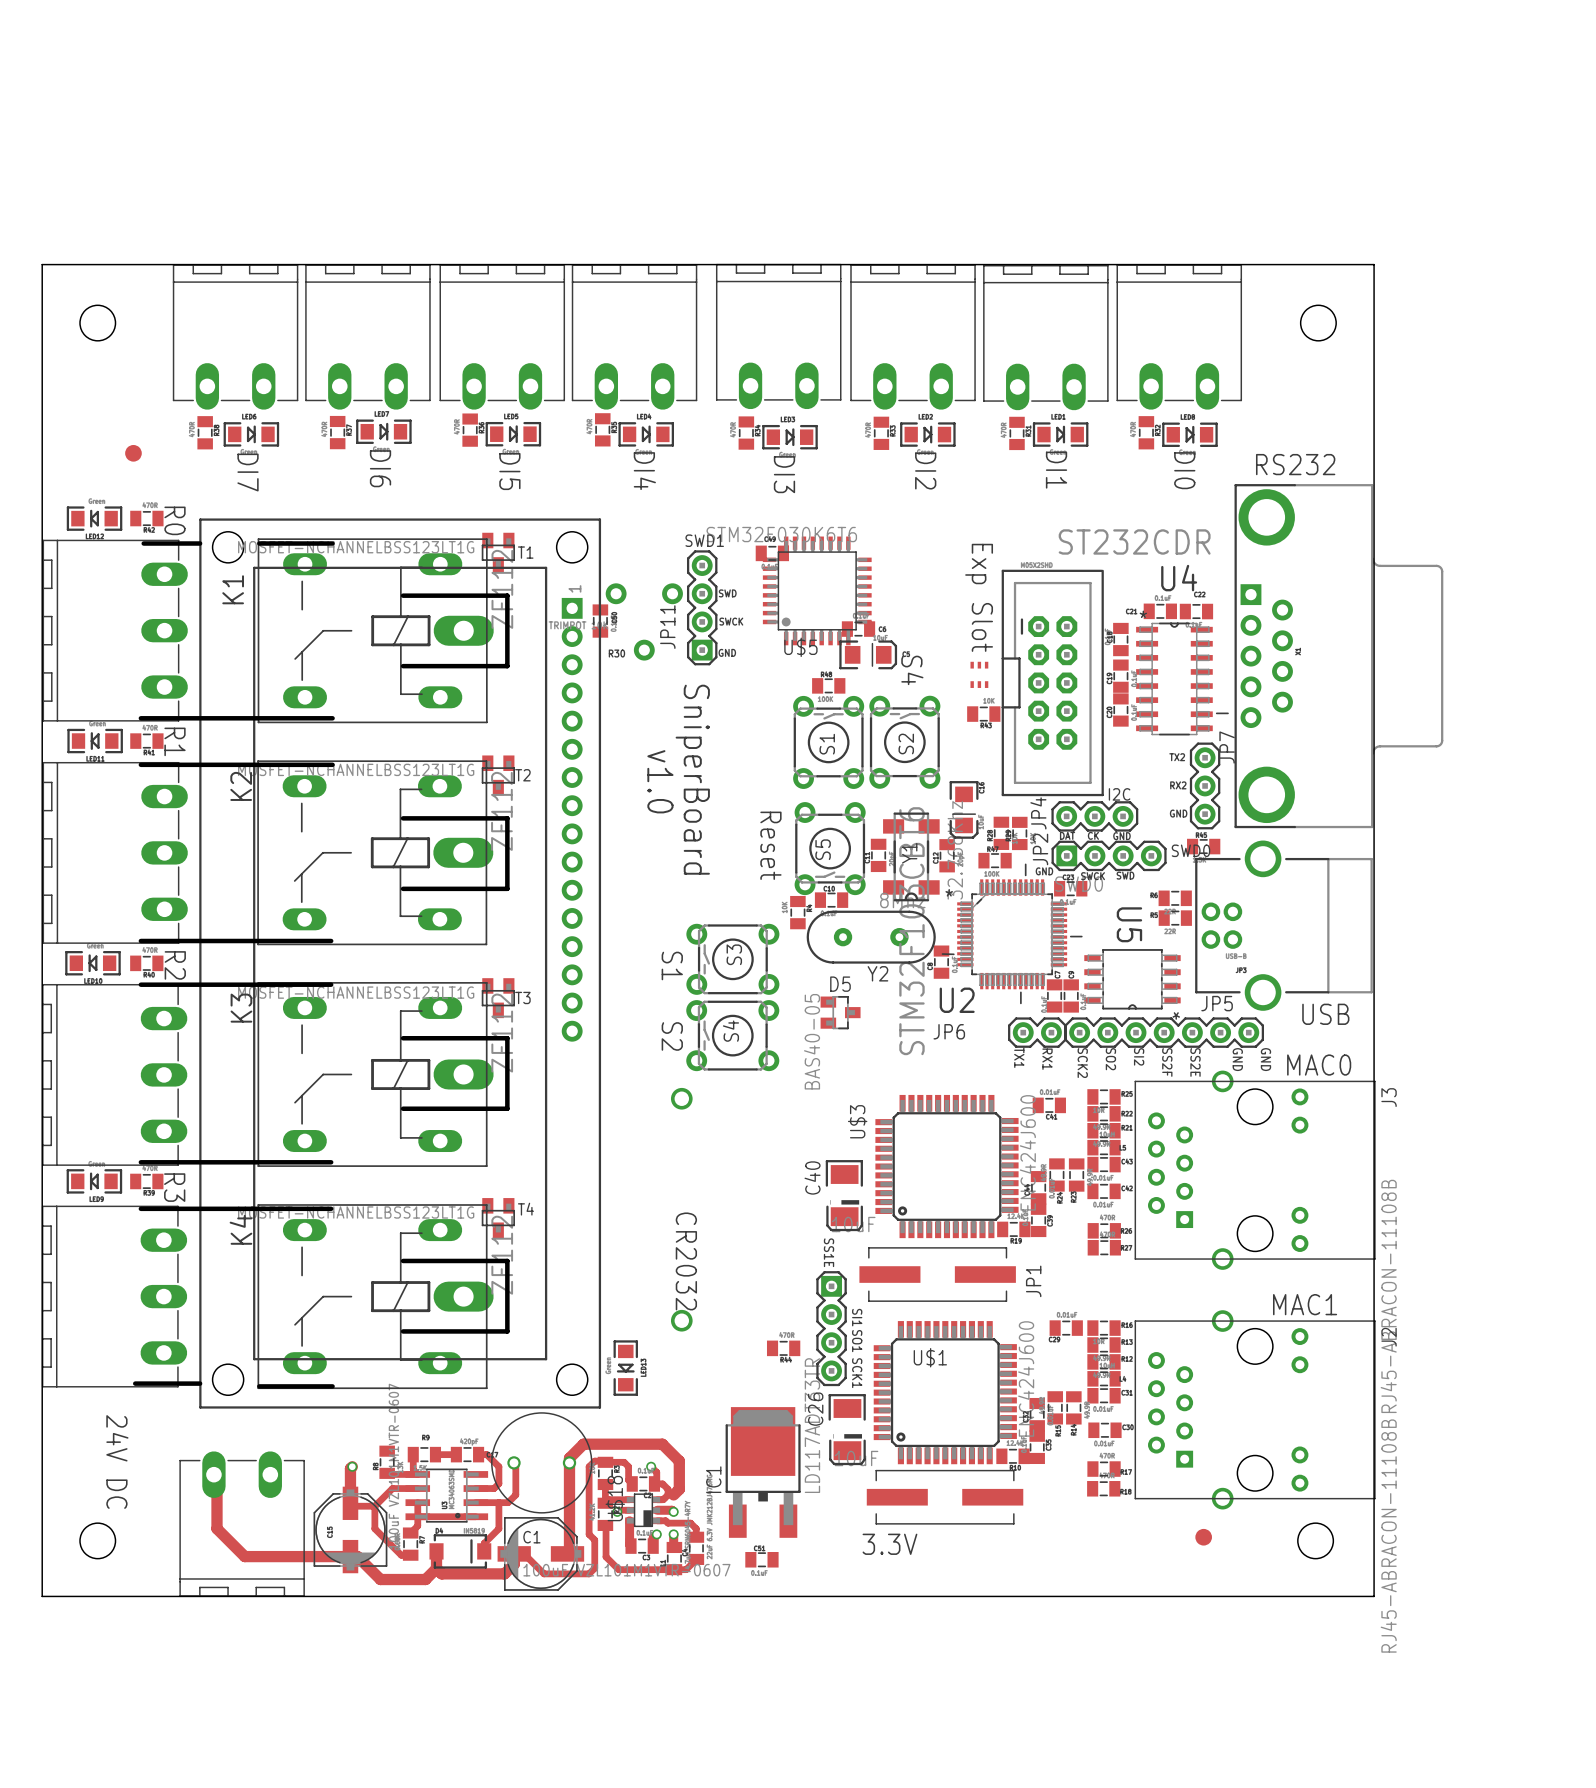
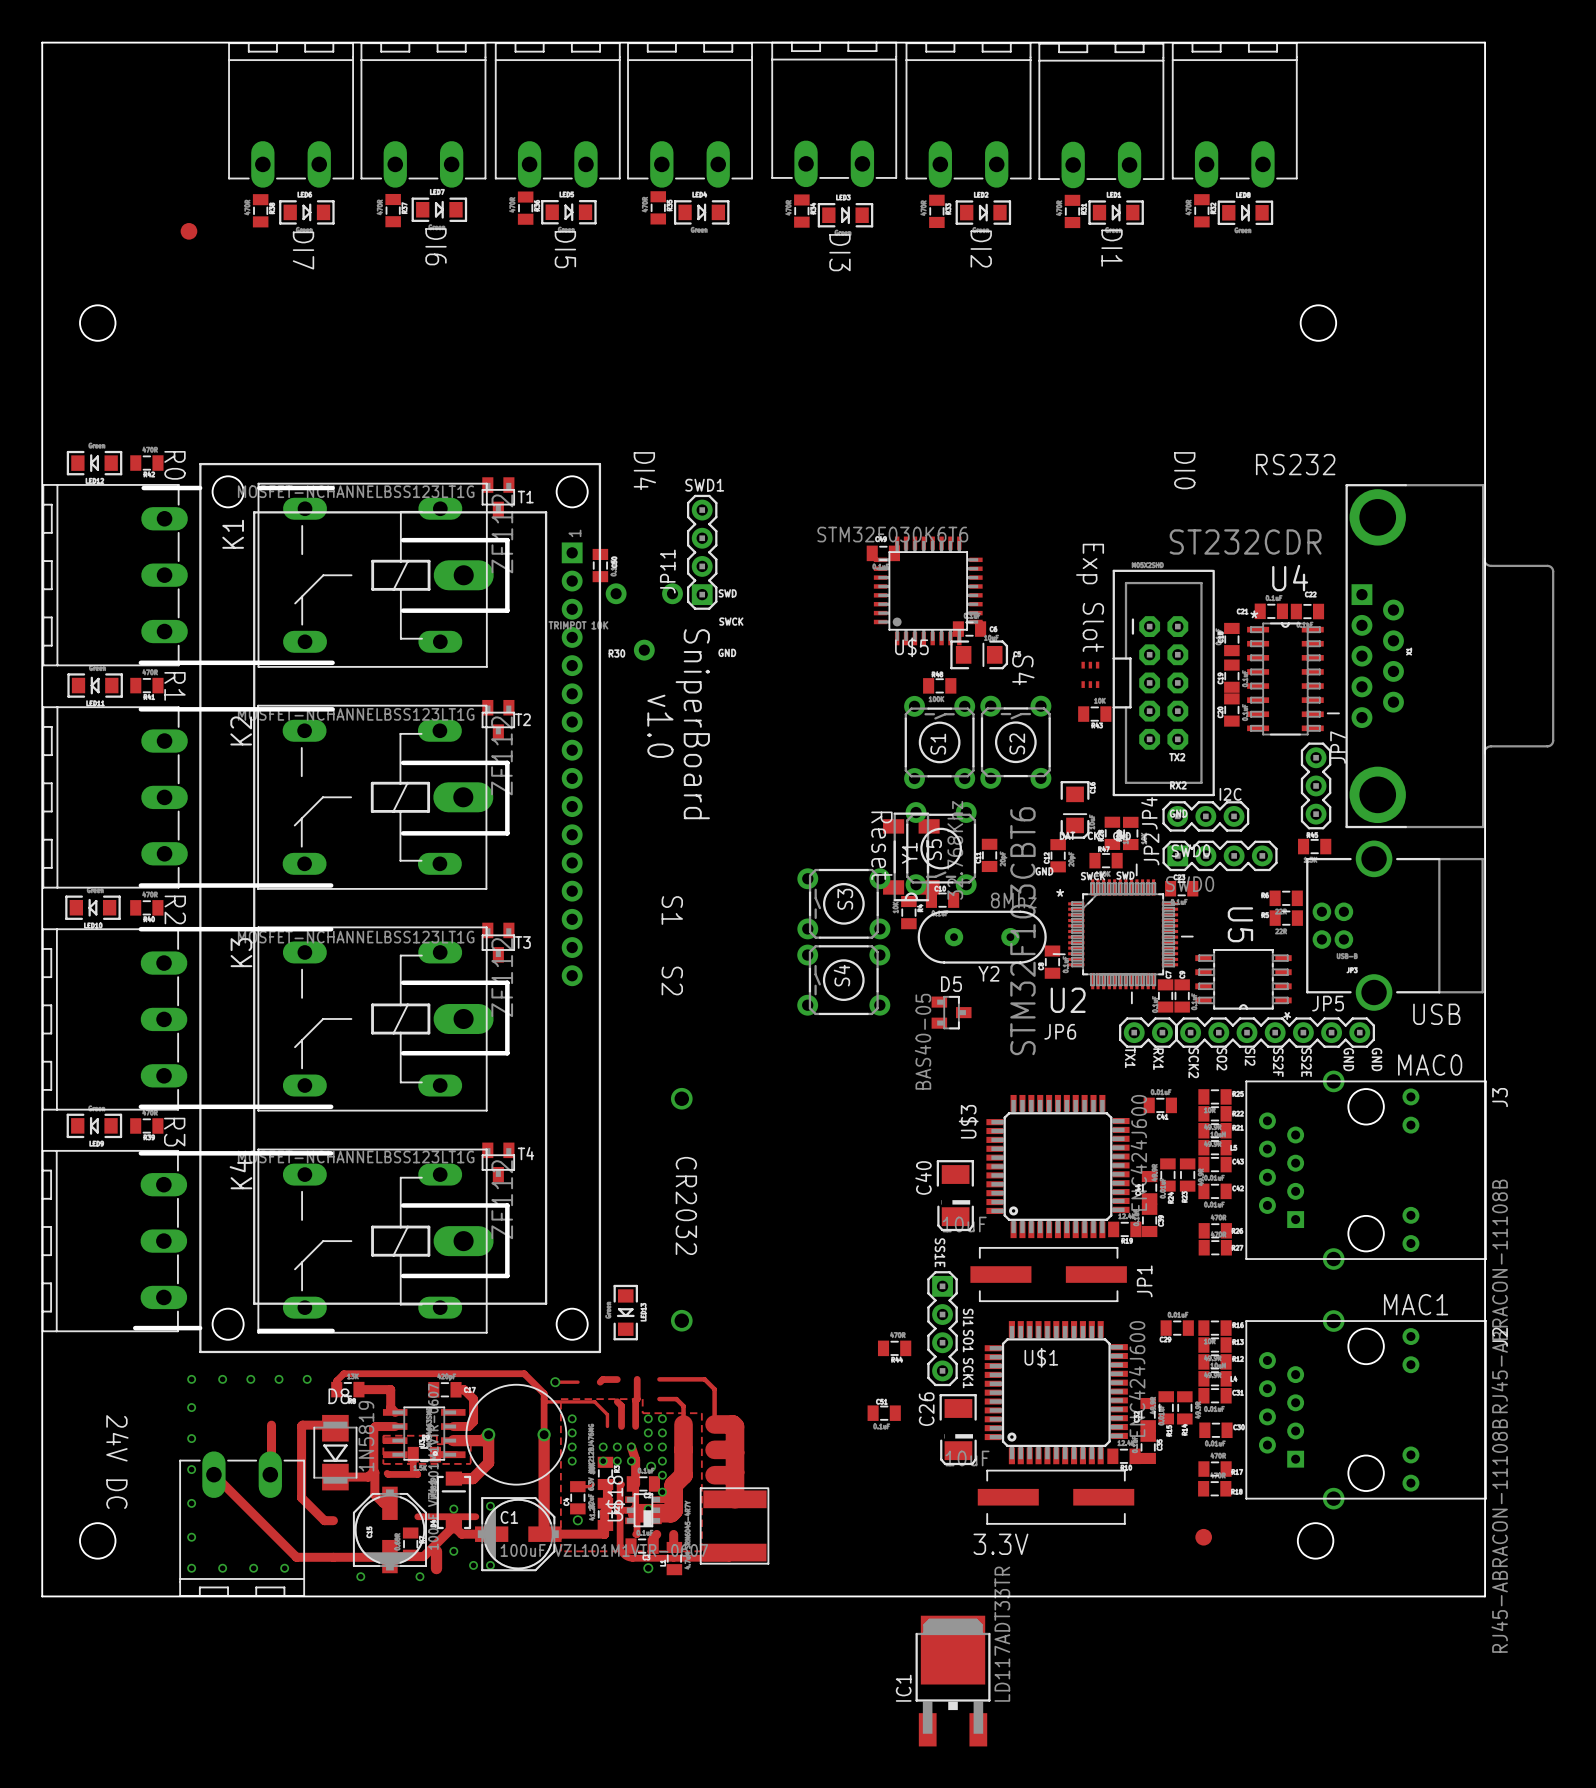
part: none -> (834, 114)
part: none -> (291, 115)
part: none -> (423, 115)
part: none -> (557, 115)
part: none -> (690, 115)
part: none -> (968, 115)
part: none -> (1101, 115)
part: none -> (1234, 115)
board edge: (42, 264) (1374, 264) (1374, 1596) -> (42, 264) (42, 42) (1485, 42) (1485, 1596) (1374, 1596)
part: (778, 336) -> none
part: (235, 337) -> none
part: (367, 337) -> none
part: (502, 337) -> none
part: (634, 337) -> none
part: (913, 337) -> none
part: (1045, 337) -> none
part: (1179, 337) -> none
part position: (602, 429) -> (658, 207)
part position: (470, 430) -> (525, 208)
part position: (383, 431) -> (439, 209)
part position: (205, 432) -> (260, 210)
part position: (337, 432) -> (393, 210)
part position: (1146, 432) -> (1201, 210)
part position: (746, 433) -> (801, 211)
part position: (881, 433) -> (936, 211)
part position: (1016, 433) -> (1072, 211)
part position: (251, 434) -> (306, 212)
part position: (513, 434) -> (568, 212)
part position: (646, 434) -> (701, 212)
part position: (927, 434) -> (983, 212)
part position: (1060, 434) -> (1116, 212)
part position: (1189, 434) -> (1245, 212)
part position: (790, 437) -> (845, 215)
part position: (133, 453) -> (188, 231)
text position: DI6 (380, 468) -> DI6 (436, 246)
text position: DI2 (925, 470) -> DI2 (981, 249)
text position: DI1 (1056, 470) -> DI1 (1112, 248)
text position: DI5 (509, 471) -> DI5 (565, 249)
text position: DI7 (248, 472) -> DI7 (303, 250)
text position: DI3 (784, 474) -> DI3 (839, 252)
part position: (94, 518) -> (94, 463)
part position: (146, 518) -> (146, 463)
text position: R0 (174, 520) -> R0 (174, 465)
text position: SWD1 (704, 540) -> SWD1 (704, 485)
board edge: (143, 543) (200, 543) -> (143, 488) (200, 488)
board edge: (259, 543) (332, 543) -> (259, 488) (332, 488)
T1 position: (498, 552) -> (498, 497)
part position: (772, 553) -> (883, 553)
U$5 position: (817, 590) -> (928, 590)
board edge: (403, 595) (507, 595) -> (403, 540) (507, 540) (507, 595)
text position: Exp Slot (979, 597) -> Exp Slot (1090, 597)
JP11 position: (702, 607) -> (702, 552)
board edge: (507, 610) (507, 666) (403, 666) -> (507, 610) (403, 610)
part position: (1160, 611) -> (1271, 611)
part position: (1196, 611) -> (1307, 611)
part position: (600, 621) -> (600, 565)
part position: (858, 629) -> (969, 629)
part position: (115, 630) -> (115, 575)
K1 position: (375, 630) -> (375, 575)
part position: (1120, 639) -> (1231, 639)
part position: (868, 654) -> (979, 654)
part position: (1338, 656) -> (1449, 656)
text position: S4 (912, 670) -> S4 (1023, 670)
part position: (979, 674) -> (1090, 674)
part position: (1120, 676) -> (1231, 676)
U4 position: (1182, 678) -> (1293, 678)
part position: (1052, 682) -> (1163, 682)
part position: (828, 685) -> (939, 685)
part position: (1120, 710) -> (1231, 710)
part position: (983, 714) -> (1094, 714)
board edge: (140, 718) (332, 718) -> (140, 662) (332, 662)
part position: (95, 741) -> (95, 685)
part position: (146, 741) -> (146, 685)
text position: R1 (174, 741) -> R1 (174, 686)
S1 position: (828, 742) -> (939, 742)
S2 position: (904, 742) -> (1015, 742)
board edge: (140, 764) (332, 764) -> (140, 709) (332, 709)
T2 position: (498, 775) -> (498, 719)
text position: SniperBoard (692, 779) -> SniperBoard (692, 724)
text position: v1.0 (660, 781) -> v1.0 (660, 726)
JP7 position: (1205, 785) -> (1316, 785)
text position: I2C (1119, 794) -> I2C (1230, 794)
part position: (964, 809) -> (1075, 809)
JP4 position: (1094, 816) -> (1205, 816)
board edge: (403, 818) (507, 818) -> (403, 762) (507, 762) (507, 818)
board edge: (507, 833) (507, 888) (403, 888) -> (507, 833) (403, 833)
part position: (1001, 833) -> (1112, 833)
part position: (1019, 833) -> (1130, 833)
text position: Reset (770, 845) -> Reset (881, 845)
part position: (1203, 846) -> (1314, 846)
S5 position: (830, 848) -> (941, 848)
part position: (115, 852) -> (115, 797)
K2 position: (375, 852) -> (375, 797)
part position: (878, 855) -> (989, 855)
part position: (947, 855) -> (1058, 855)
JP2 position: (1109, 855) -> (1220, 855)
part position: (995, 860) -> (1106, 860)
part position: (1070, 888) -> (1181, 888)
part position: (1175, 898) -> (1286, 898)
part position: (831, 900) -> (942, 900)
part position: (797, 912) -> (908, 912)
part position: (1175, 918) -> (1286, 918)
part position: (1283, 925) -> (1394, 925)
U2 position: (1012, 933) -> (1123, 933)
Y2 position: (871, 937) -> (982, 937)
board edge: (140, 941) (331, 941) -> (140, 885) (331, 885)
S3 position: (732, 959) -> (843, 903)
part position: (941, 962) -> (1052, 962)
part position: (92, 963) -> (92, 907)
part position: (146, 963) -> (146, 907)
part position: (400, 963) -> (400, 908)
text position: R2 (175, 965) -> R2 (175, 909)
text position: S1 (672, 966) -> S1 (672, 910)
U5 position: (1132, 979) -> (1243, 979)
board edge: (140, 984) (331, 984) -> (140, 929) (331, 929)
part position: (1054, 995) -> (1165, 995)
part position: (1071, 995) -> (1182, 995)
T3 position: (498, 998) -> (498, 942)
D5 position: (840, 1012) -> (951, 1012)
text position: USB (1325, 1014) -> USB (1436, 1014)
JP6 position: (1037, 1032) -> (1148, 1032)
JP5 position: (1164, 1032) -> (1275, 1032)
S4 position: (732, 1035) -> (843, 980)
text position: S2 (672, 1036) -> S2 (672, 980)
board edge: (403, 1038) (507, 1038) -> (403, 982) (507, 982) (507, 1038)
board edge: (507, 1053) (507, 1108) (403, 1108) -> (507, 1053) (403, 1053)
text position: SI2 (1139, 1056) -> SI2 (1250, 1056)
text position: TX1 (1019, 1057) -> TX1 (1130, 1057)
text position: RX1 (1047, 1059) -> RX1 (1158, 1059)
text position: SO2 (1110, 1059) -> SO2 (1221, 1059)
text: GND (1237, 1059) -> none
text: GND (1265, 1059) -> none
text: none -> GND (1348, 1059)
text: none -> GND (1376, 1059)
text position: SS2F (1167, 1062) -> SS2F (1278, 1062)
text position: SS2E (1195, 1062) -> SS2E (1306, 1062)
text position: SCK2 (1082, 1063) -> SCK2 (1193, 1063)
text position: MAC0 (1319, 1065) -> MAC0 (1430, 1065)
part position: (114, 1074) -> (114, 1019)
K3 position: (375, 1074) -> (375, 1018)
part position: (1103, 1096) -> (1214, 1096)
part position: (1049, 1105) -> (1160, 1105)
part position: (1103, 1113) -> (1214, 1113)
part position: (1103, 1130) -> (1214, 1130)
part position: (1103, 1147) -> (1214, 1147)
board edge: (140, 1162) (331, 1162) -> (140, 1106) (331, 1106)
part position: (1104, 1164) -> (1215, 1164)
U$3 position: (946, 1166) -> (1057, 1166)
J3 position: (1255, 1170) -> (1366, 1170)
part position: (1056, 1174) -> (1167, 1174)
part position: (1076, 1175) -> (1187, 1175)
part position: (94, 1181) -> (94, 1125)
part position: (146, 1181) -> (146, 1125)
text position: R3 (174, 1187) -> R3 (174, 1132)
part position: (1038, 1187) -> (1149, 1187)
part position: (1104, 1191) -> (1215, 1191)
C40 position: (844, 1195) -> (955, 1195)
board edge: (140, 1208) (331, 1208) -> (140, 1153) (331, 1153)
T4 position: (498, 1218) -> (498, 1162)
part position: (1038, 1220) -> (1149, 1220)
part position: (1013, 1229) -> (1124, 1229)
part position: (1104, 1230) -> (1215, 1230)
part position: (1104, 1247) -> (1215, 1247)
text position: SS1E (829, 1252) -> SS1E (940, 1252)
board edge: (403, 1260) (507, 1260) -> (403, 1205) (507, 1205) (507, 1260)
text position: CR2032 (686, 1261) -> CR2032 (686, 1205)
part position: (937, 1274) -> (1048, 1274)
board edge: (507, 1275) (507, 1331) (403, 1331) -> (507, 1275) (403, 1275)
part position: (114, 1296) -> (114, 1241)
K4 position: (375, 1296) -> (375, 1241)
text position: MAC1 (1305, 1304) -> MAC1 (1416, 1304)
text position: SI1 (857, 1317) -> SI1 (968, 1317)
JP1 position: (831, 1328) -> (942, 1328)
part position: (1066, 1328) -> (1177, 1328)
part position: (1103, 1328) -> (1214, 1328)
text position: SO1 (857, 1341) -> SO1 (968, 1341)
part position: (1103, 1345) -> (1214, 1345)
part position: (783, 1348) -> (894, 1348)
part position: (1103, 1361) -> (1214, 1361)
part position: (625, 1368) -> (625, 1312)
text position: SCK1 (857, 1373) -> SCK1 (968, 1373)
part position: (1104, 1378) -> (1215, 1378)
via: none -> (191, 1379)
via: none -> (222, 1379)
via: none -> (250, 1379)
via: none -> (279, 1379)
via: none -> (307, 1379)
track: none -> (617, 1379) (602, 1379) (600, 1382)
track: none -> (637, 1379) (635, 1426)
track: none -> (659, 1379) (704, 1379) (714, 1389) (714, 1424) (732, 1424) (735, 1426) (735, 1499)
track: none -> (555, 1382) (578, 1382)
via: none -> (555, 1382)
board edge: (135, 1383) (200, 1383) -> (135, 1328) (200, 1328)
board edge: (259, 1386) (332, 1386) -> (259, 1330) (332, 1330)
track: none -> (336, 1389) (336, 1380) (343, 1373) (524, 1373) (544, 1393) (544, 1533) (604, 1534) (607, 1484)
track: none -> (358, 1389) (390, 1389) (390, 1407) (395, 1412)
track: none -> (456, 1389) (464, 1389) (473, 1399) (473, 1421) (468, 1426) (453, 1426)
U$1 position: (945, 1392) -> (1056, 1392)
part position: (1104, 1395) -> (1215, 1395)
track: none -> (544, 1399) (546, 1401) (594, 1401) (607, 1414) (607, 1426)
zone outline: none -> (560, 1399) (642, 1399) (642, 1413) (701, 1413) (701, 1551) (560, 1551) (560, 1399)
track: none -> (659, 1399) (676, 1399) (683, 1406) (683, 1475) (673, 1485) (673, 1510) (671, 1513) (637, 1513)
track: none -> (617, 1401) (621, 1405) (621, 1426)
via: none -> (191, 1407)
part position: (1055, 1407) -> (1166, 1407)
part position: (1073, 1407) -> (1184, 1407)
J2 position: (1255, 1409) -> (1366, 1409)
part position: (1037, 1414) -> (1148, 1414)
via: none -> (572, 1418)
via: none -> (648, 1418)
via: none -> (662, 1418)
track: none -> (271, 1425) (270, 1474)
track: none -> (395, 1426) (375, 1426) (373, 1428) (373, 1471)
track: none -> (335, 1428) (335, 1425) (301, 1426) (301, 1497) (324, 1520) (333, 1520)
C26 position: (847, 1429) -> (958, 1429)
part position: (1104, 1430) -> (1215, 1430)
via: none -> (572, 1432)
via: none -> (648, 1432)
via: none -> (662, 1432)
zone outline: none -> (383, 1435) (436, 1435) (436, 1444) (470, 1444) (470, 1463) (383, 1463) (383, 1435)
via: none -> (191, 1438)
track: none -> (453, 1440) (482, 1440) (488, 1434) (488, 1462) (472, 1478) (453, 1478)
via: none -> (572, 1447)
via: none -> (603, 1447)
via: none -> (617, 1447)
track: none -> (631, 1447) (635, 1459) (637, 1513)
via: none -> (631, 1447)
via: none -> (648, 1447)
via: none -> (662, 1447)
part position: (1037, 1447) -> (1148, 1447)
track: none -> (714, 1449) (732, 1449) (735, 1452)
D8: none -> 1N5819 (335, 1452)
part position: (467, 1454) -> (444, 1389)
track: (478, 1454) (486, 1454) (498, 1466) (498, 1483) (494, 1488) (475, 1488) -> none
part position: (1012, 1456) -> (1123, 1456)
via: none -> (572, 1461)
via: none -> (603, 1461)
via: none -> (617, 1461)
via: none -> (631, 1461)
via: none -> (662, 1461)
part rotation: 0° (387, 1462) -> 90° clockwise (347, 1389)
part position: (387, 1462) -> (347, 1389)
track: (514, 1462) (515, 1464) (515, 1494) (508, 1502) (475, 1502) -> none
part position: (541, 1462) -> (516, 1434)
track: (352, 1466) (350, 1468) (350, 1503) (353, 1506) (374, 1506) -> none
via: (352, 1466) -> none
track: (651, 1466) (656, 1472) (656, 1481) (654, 1483) (662, 1483) (668, 1489) (668, 1494) (673, 1494) (679, 1489) (679, 1461) (662, 1444) (583, 1444) (569, 1458) (569, 1551) (567, 1553) -> none
via: none -> (191, 1469)
part position: (1104, 1469) -> (1215, 1469)
track: none -> (373, 1471) (368, 1477) (335, 1477)
track: none -> (373, 1471) (374, 1494) (383, 1503) (389, 1503)
track: none -> (735, 1472) (732, 1475) (714, 1475)
IC1 position: (763, 1472) -> (953, 1681)
via: none -> (662, 1475)
track: (217, 1477) (217, 1528) (244, 1556) (357, 1556) (380, 1579) (425, 1579) (436, 1568) (441, 1573) (504, 1573) (514, 1564) (514, 1553) (524, 1553) (544, 1573) (589, 1573) (594, 1568) (594, 1540) (589, 1534) (589, 1466) (594, 1461) (624, 1462) (628, 1466) (628, 1480) (632, 1483) -> (217, 1477) (296, 1557) (423, 1556) (453, 1526) (461, 1534) (491, 1534)
track: none -> (593, 1484) (591, 1486) (577, 1486)
track: (605, 1484) (605, 1503) (608, 1499) (629, 1499) -> none
track: none -> (621, 1484) (620, 1547) (626, 1556) (632, 1558) (729, 1558) (734, 1552)
track: (417, 1488) (392, 1488) (374, 1506) -> none
part position: (1103, 1488) -> (1214, 1488)
via: none -> (662, 1492)
part position: (446, 1495) -> (424, 1433)
part position: (945, 1497) -> (1056, 1497)
track: (417, 1502) (417, 1525) (410, 1533) -> none
track: (498, 1502) (498, 1528) (484, 1543) (484, 1551) -> none
via: none -> (191, 1503)
track: (374, 1506) (374, 1528) (401, 1555) (410, 1555) -> none
via: none -> (490, 1506)
via: none -> (453, 1509)
via: none -> (648, 1509)
via: (617, 1511) -> none
via: (673, 1511) -> none
track: none -> (637, 1513) (635, 1534)
via: none -> (577, 1520)
track: (629, 1520) (631, 1546) -> none
track: (657, 1520) (665, 1520) (668, 1523) (690, 1523) (696, 1528) (696, 1537) -> none
track: (605, 1525) (606, 1556) (618, 1569) (686, 1569) (696, 1559) -> none
part: none -> (734, 1525)
part position: (350, 1529) -> (389, 1529)
via: (656, 1534) -> none
via: (673, 1534) -> none
via: none -> (191, 1537)
text position: 3.3V (889, 1544) -> 3.3V (1000, 1544)
part position: (696, 1548) -> (577, 1497)
via: none -> (453, 1551)
part rotation: 0° (460, 1551) -> 90° counterclockwise (453, 1502)
part position: (460, 1551) -> (453, 1502)
C1 position: (540, 1553) -> (518, 1534)
part position: (761, 1559) -> (884, 1413)
via: none -> (473, 1565)
via: none -> (490, 1565)
via: none -> (191, 1568)
via: none -> (222, 1568)
via: none -> (253, 1568)
via: none -> (284, 1568)
via: none -> (648, 1568)
via: none -> (360, 1576)
via: none -> (419, 1576)

